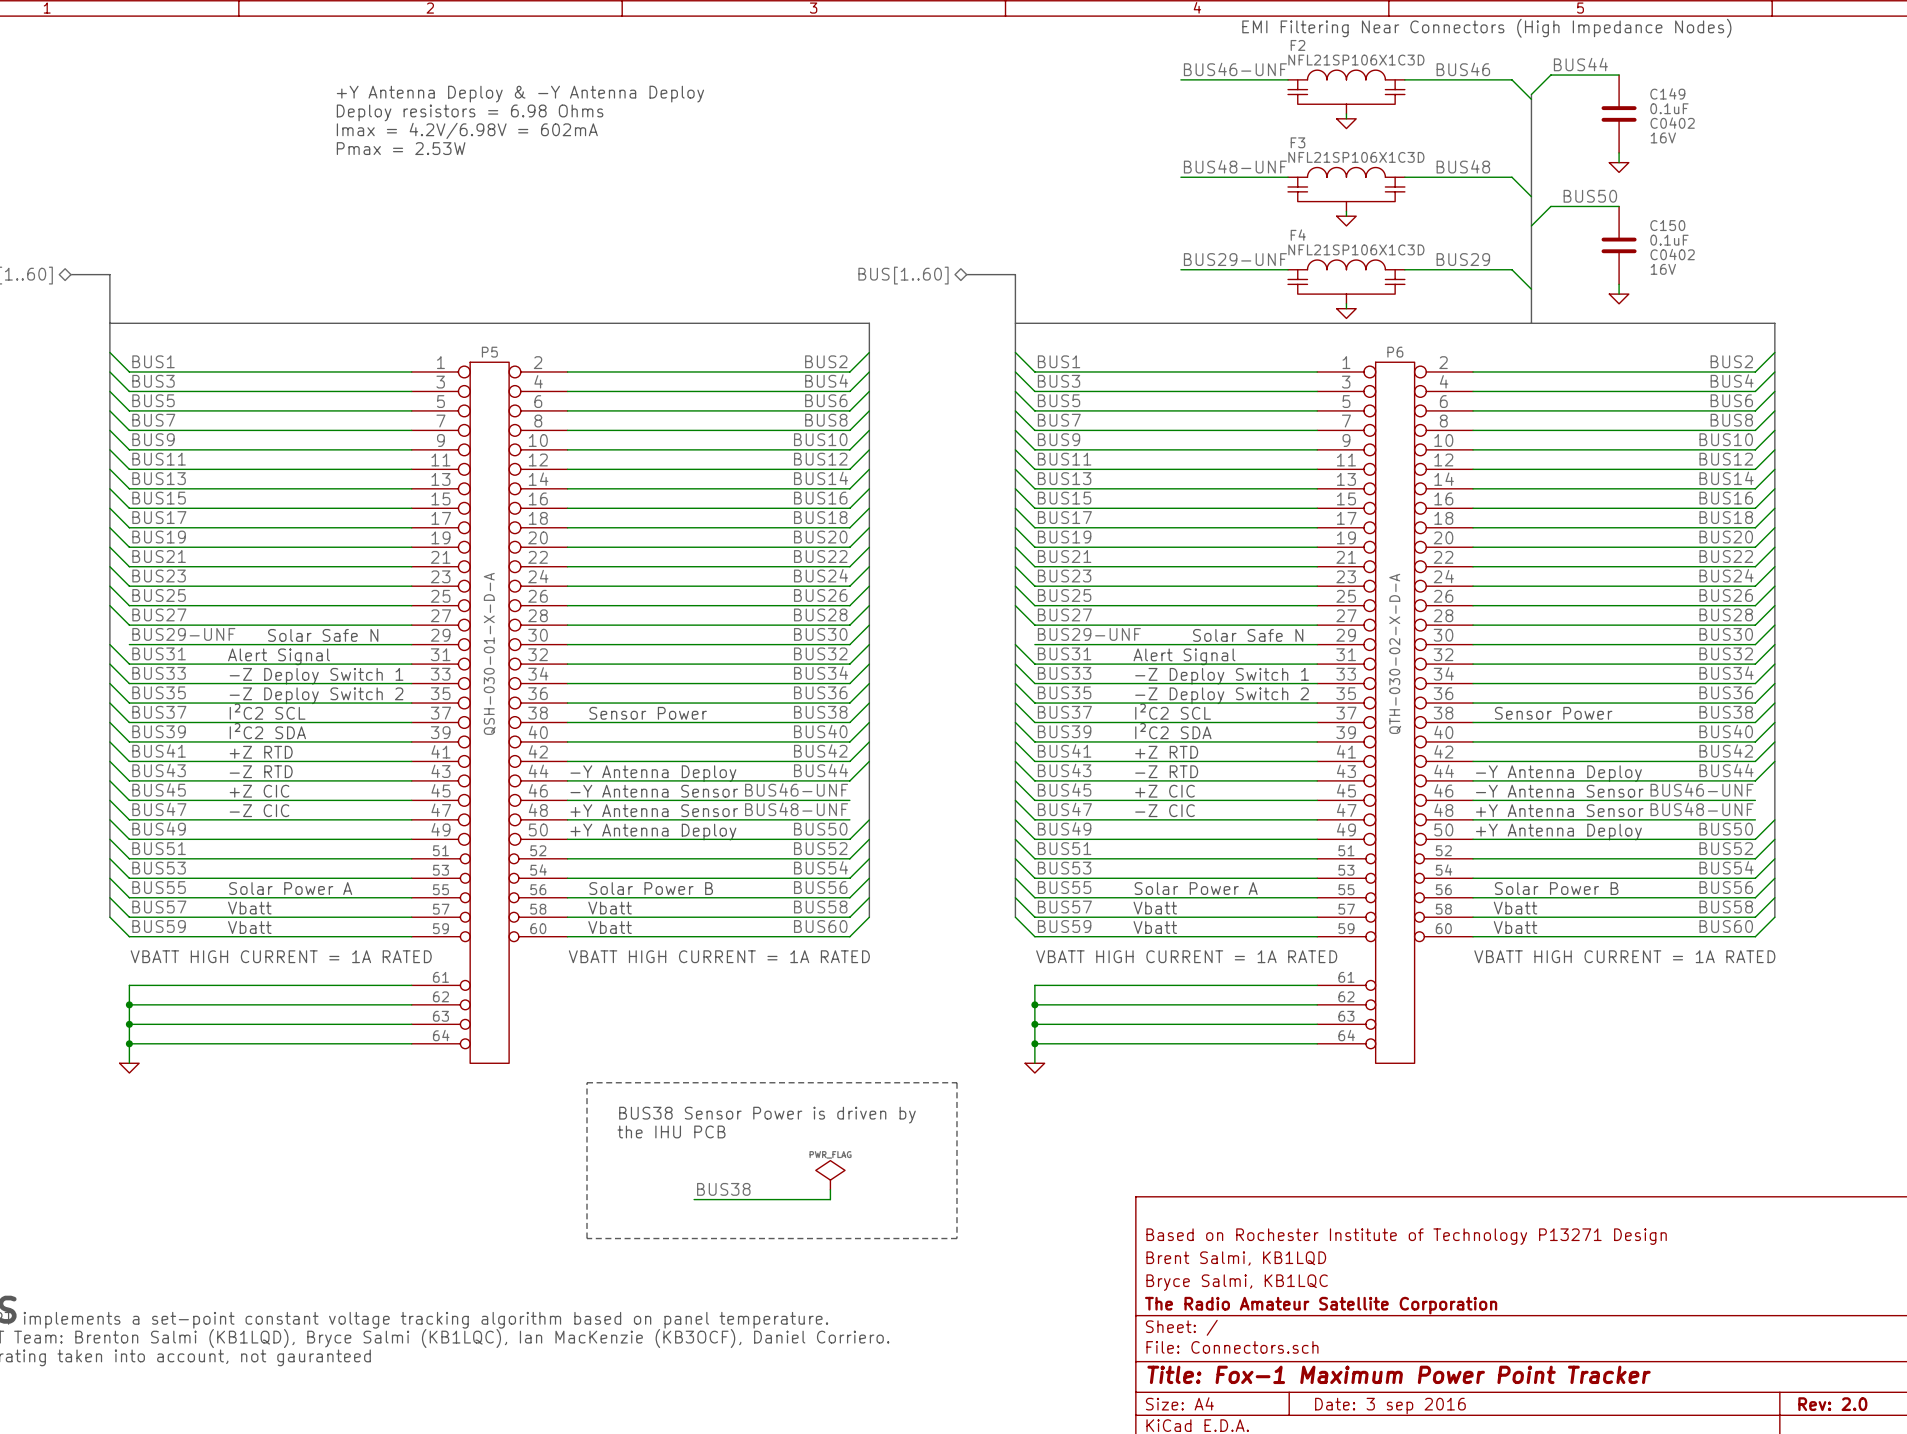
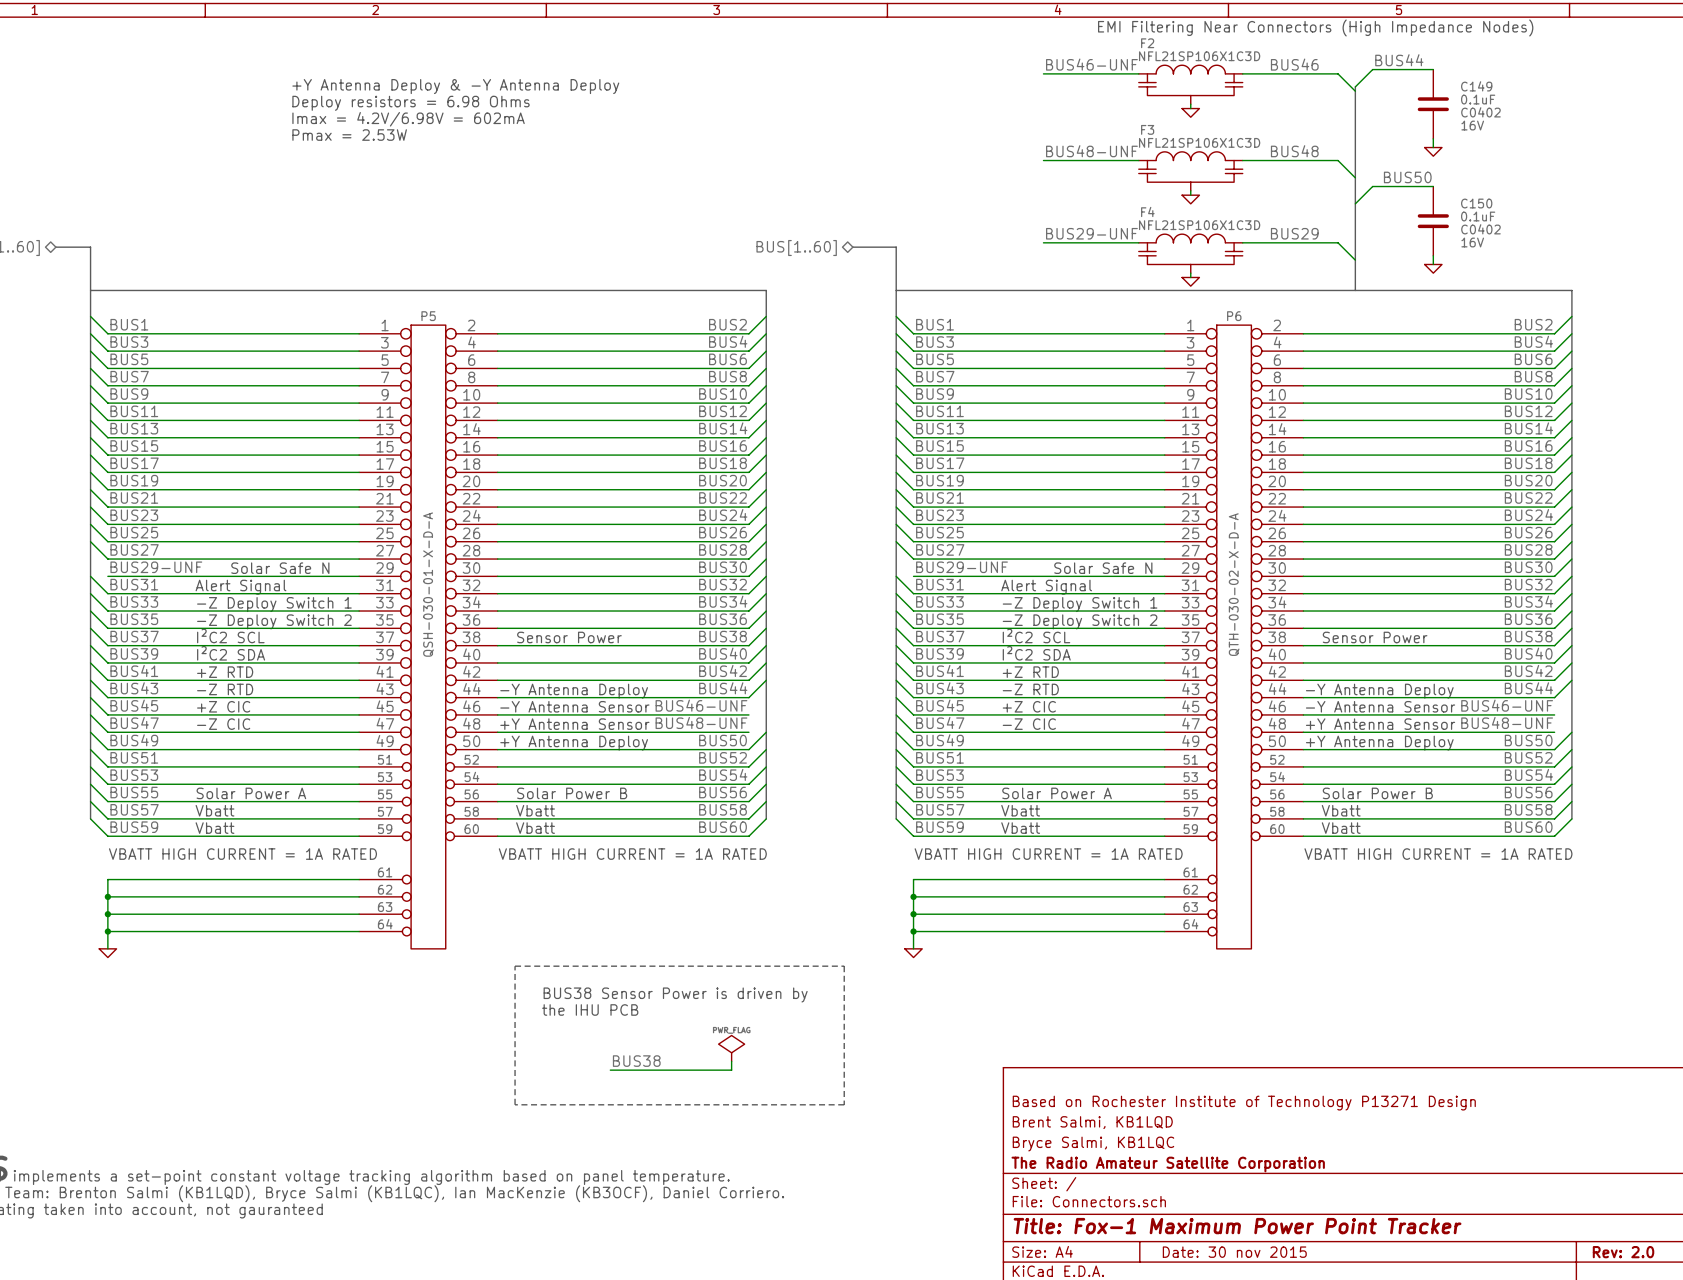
title block: Date: 3 sep 2016 (1390, 1406) -> Date: 30 nov 2015 (1234, 1252)

